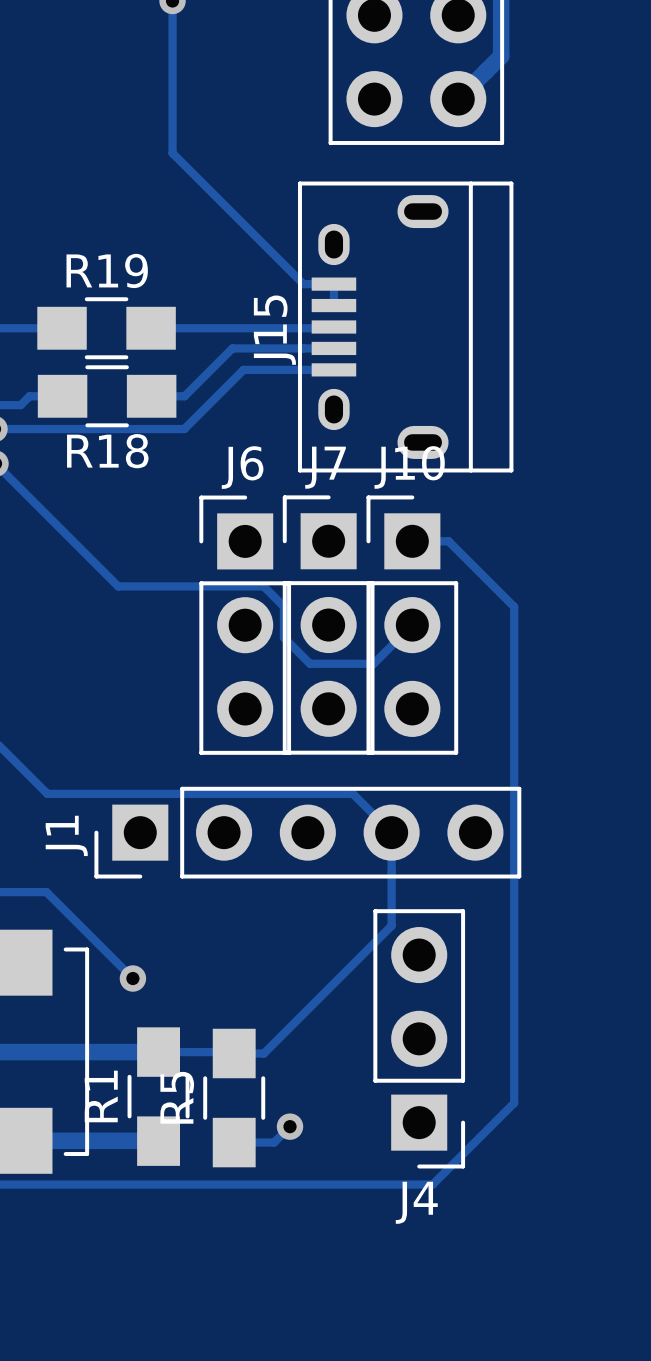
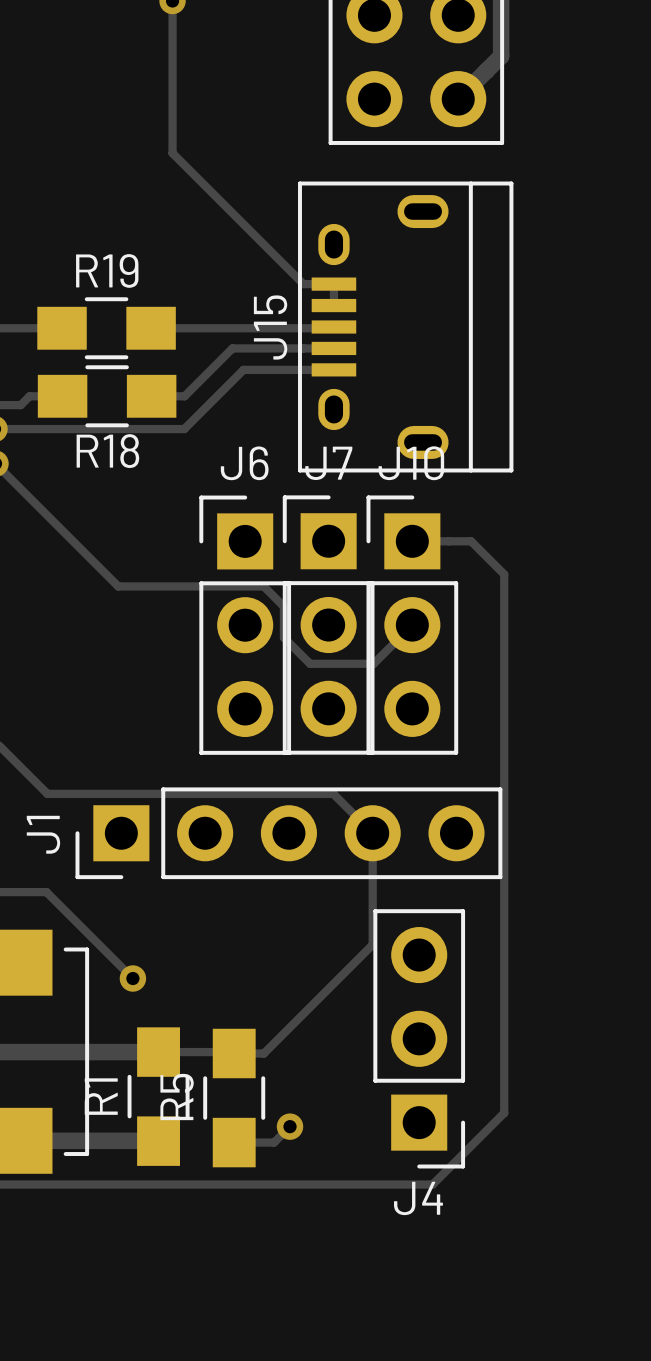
track: (448, 541) (514, 606) (514, 1103) (504, 1112) -> (448, 541) (471, 541) (504, 574) (504, 1112)
track: (333, 793) (352, 793) (391, 832) (391, 925) (372, 944) -> (333, 793) (372, 833) (372, 944)
J1 position: (307, 832) -> (288, 833)

